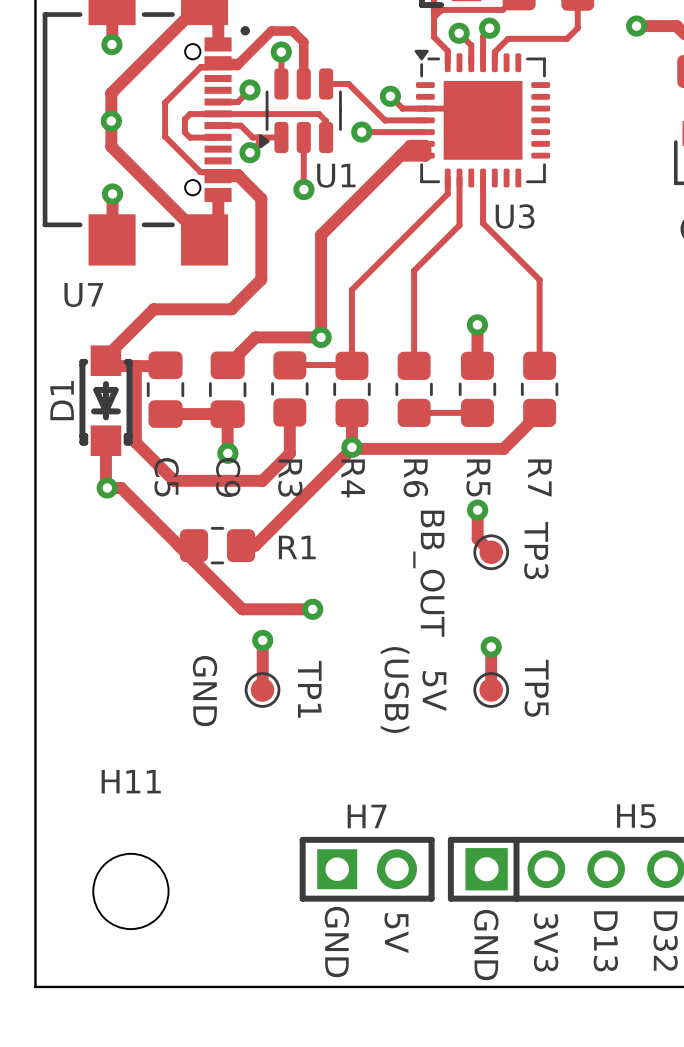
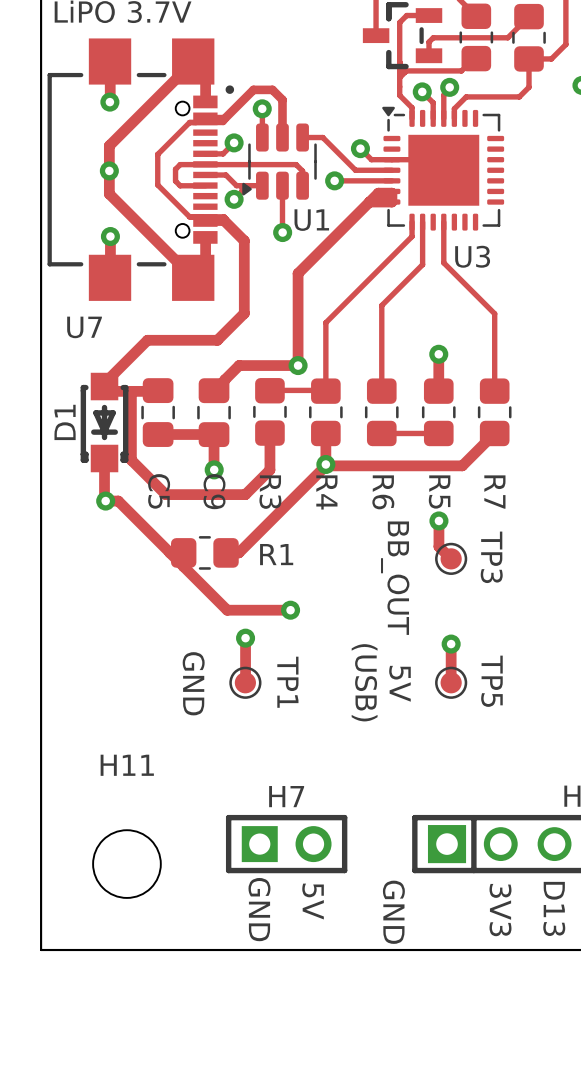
H7 position: (367, 869) -> (286, 844)
text position: 5V (396, 933) -> 5V (313, 901)
text: none -> GND (259, 909)
text: GND (336, 942) -> none
text: none -> GND (393, 912)
text: GND (486, 945) -> none

